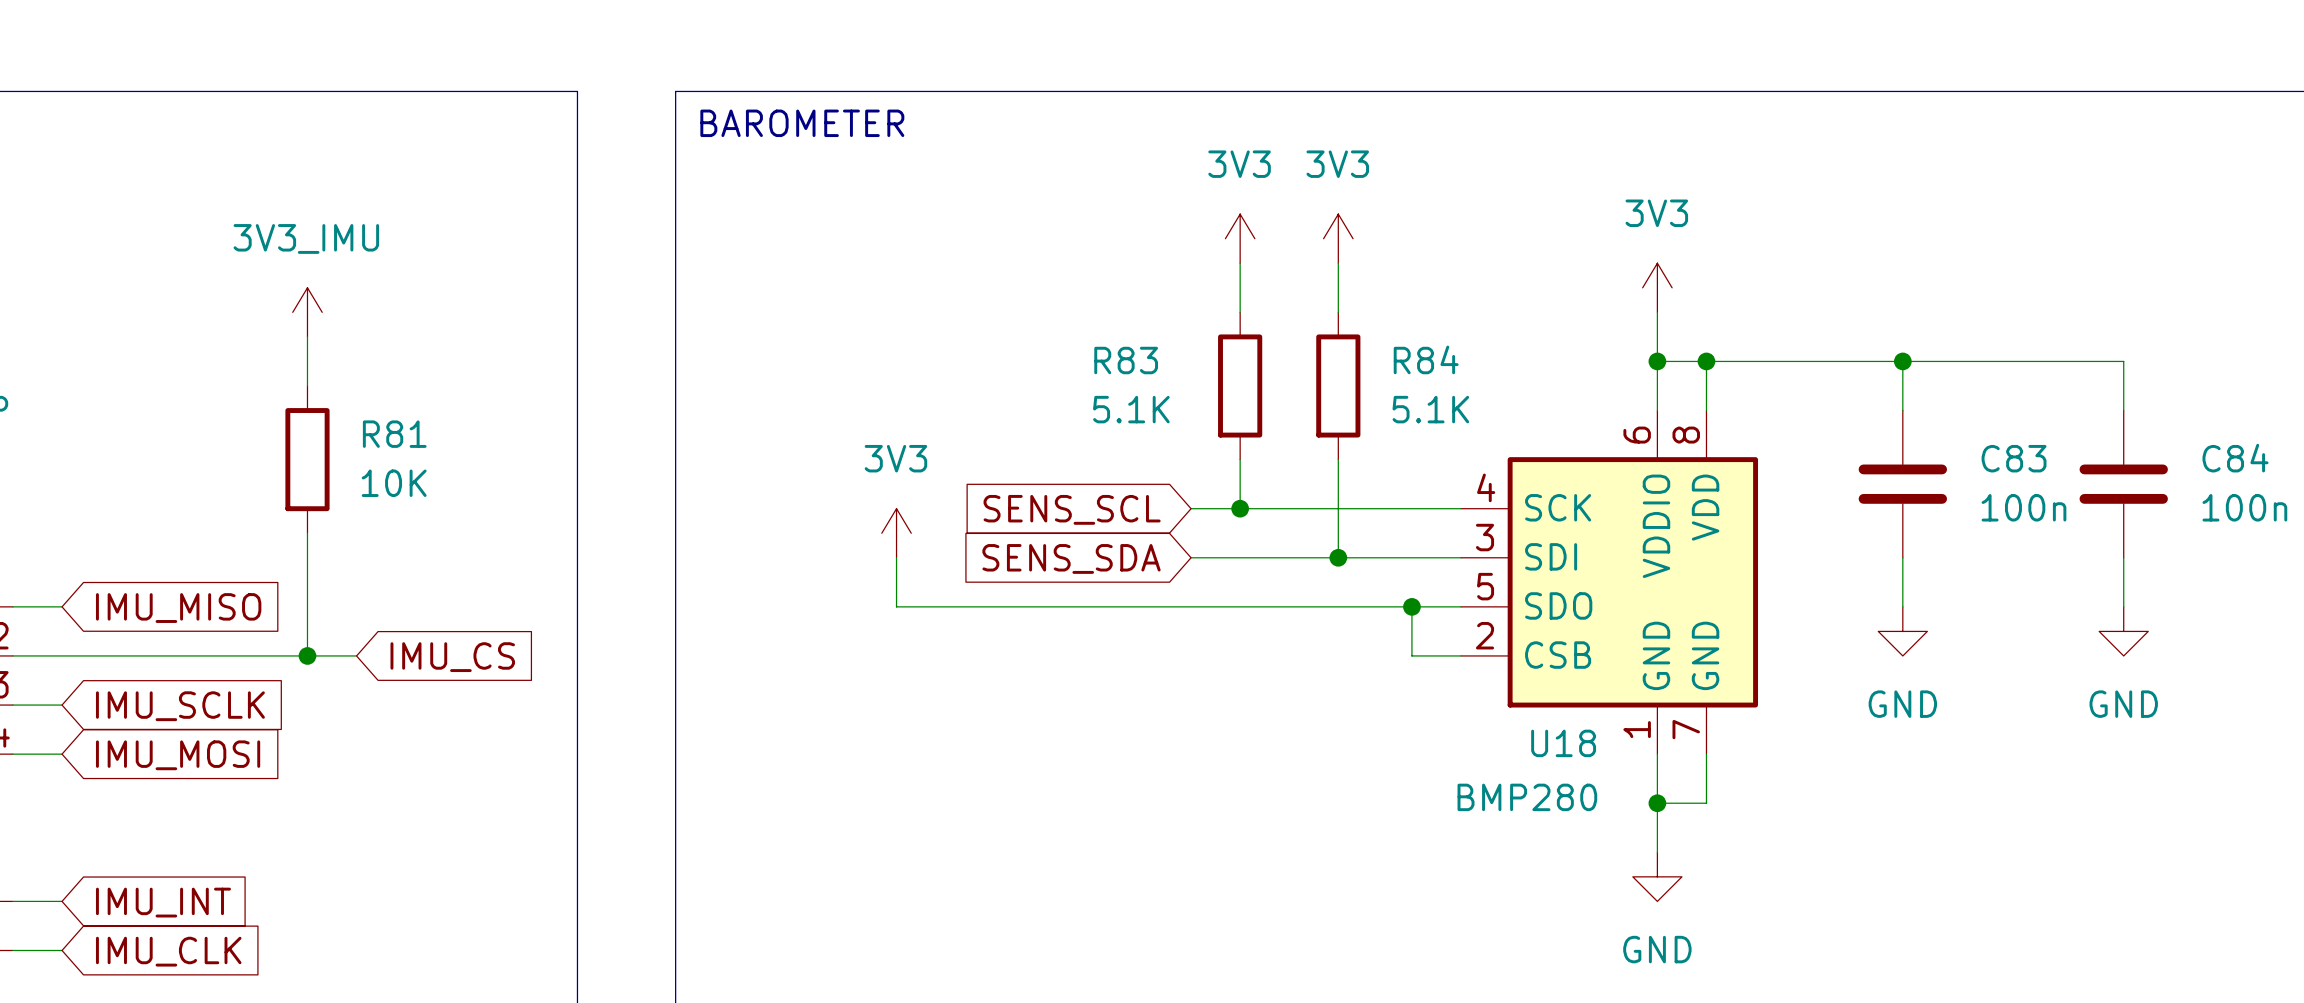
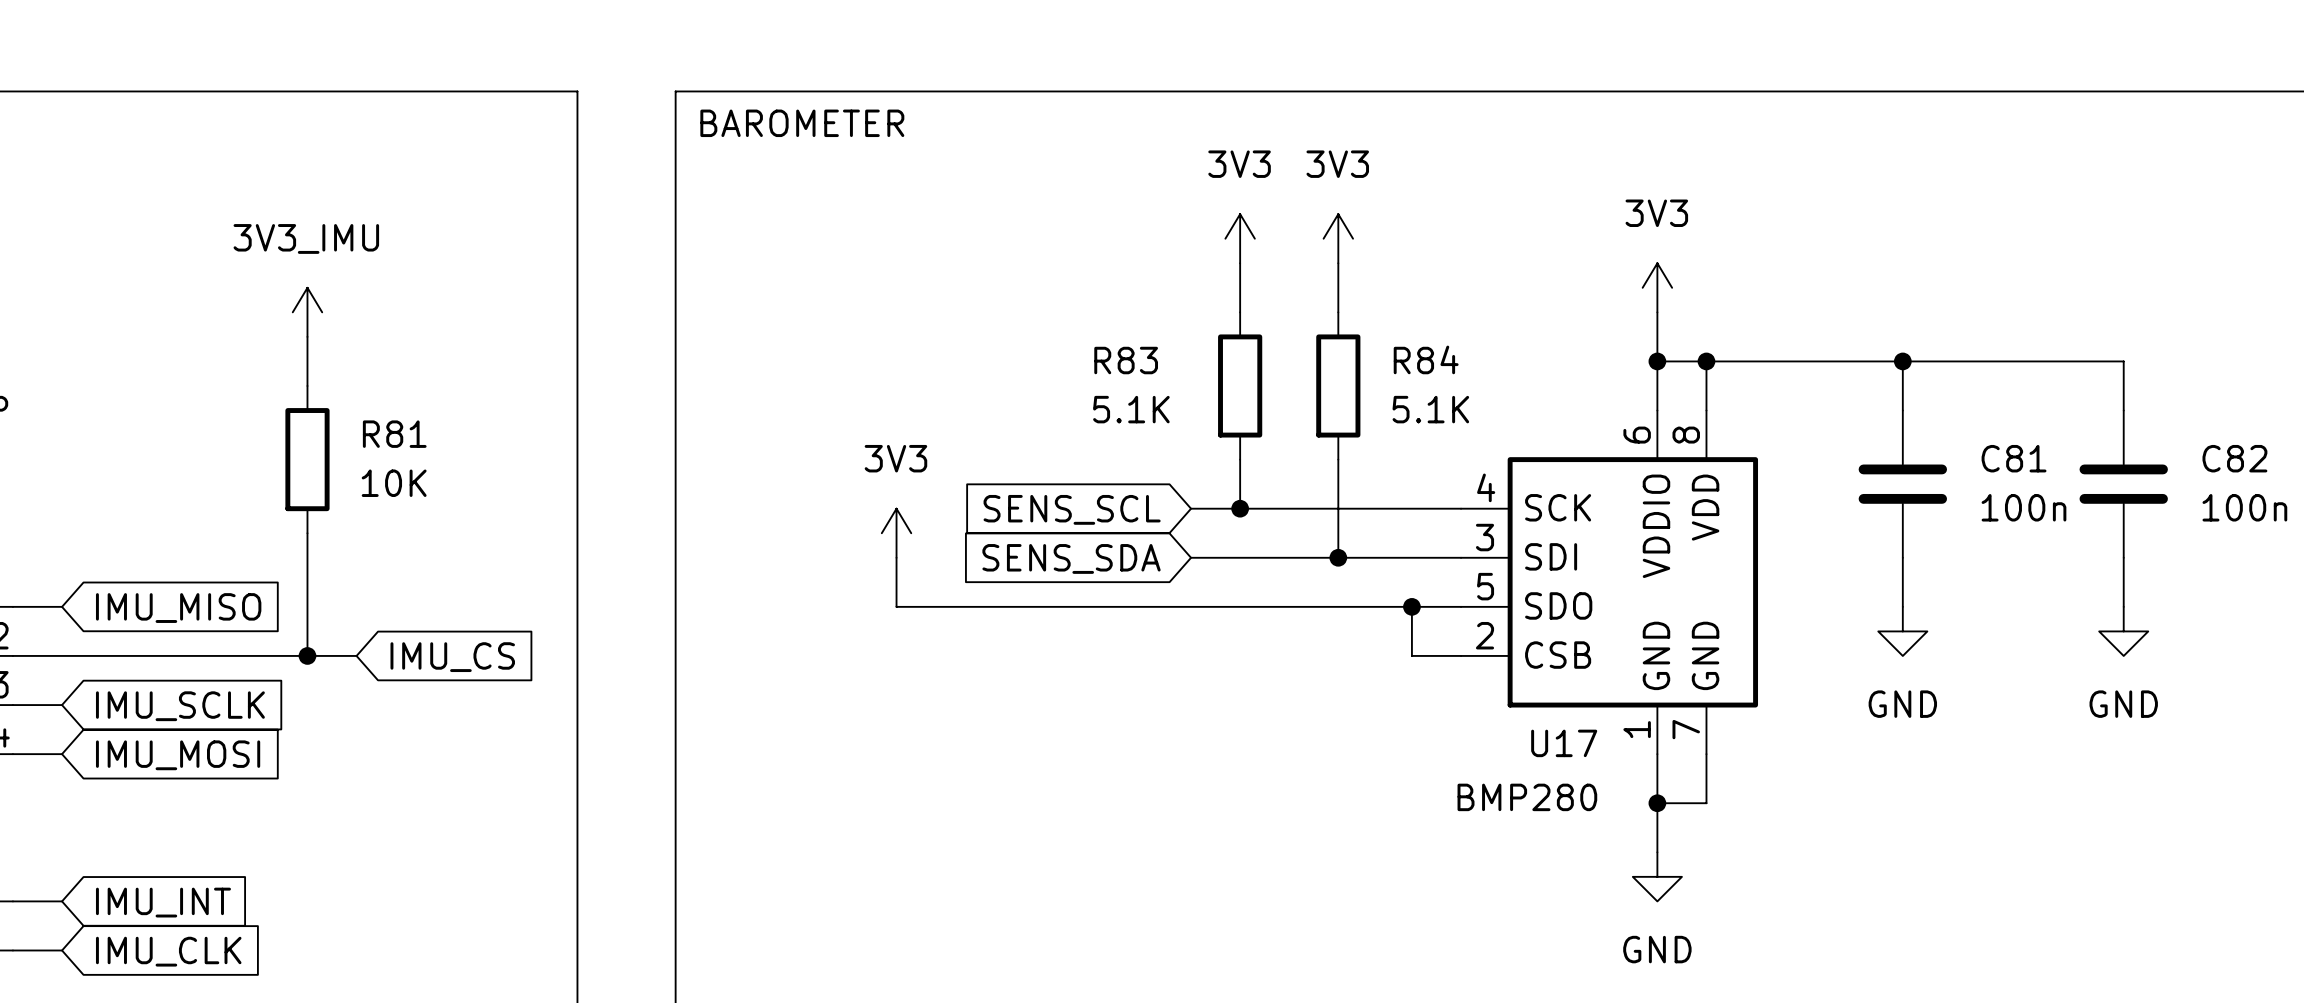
C83 name: C83 (2014, 458) -> C81 (2014, 458)
C84 name: C84 (2235, 458) -> C82 (2234, 458)
U18 name: U18 (1563, 743) -> U17 (1564, 743)

